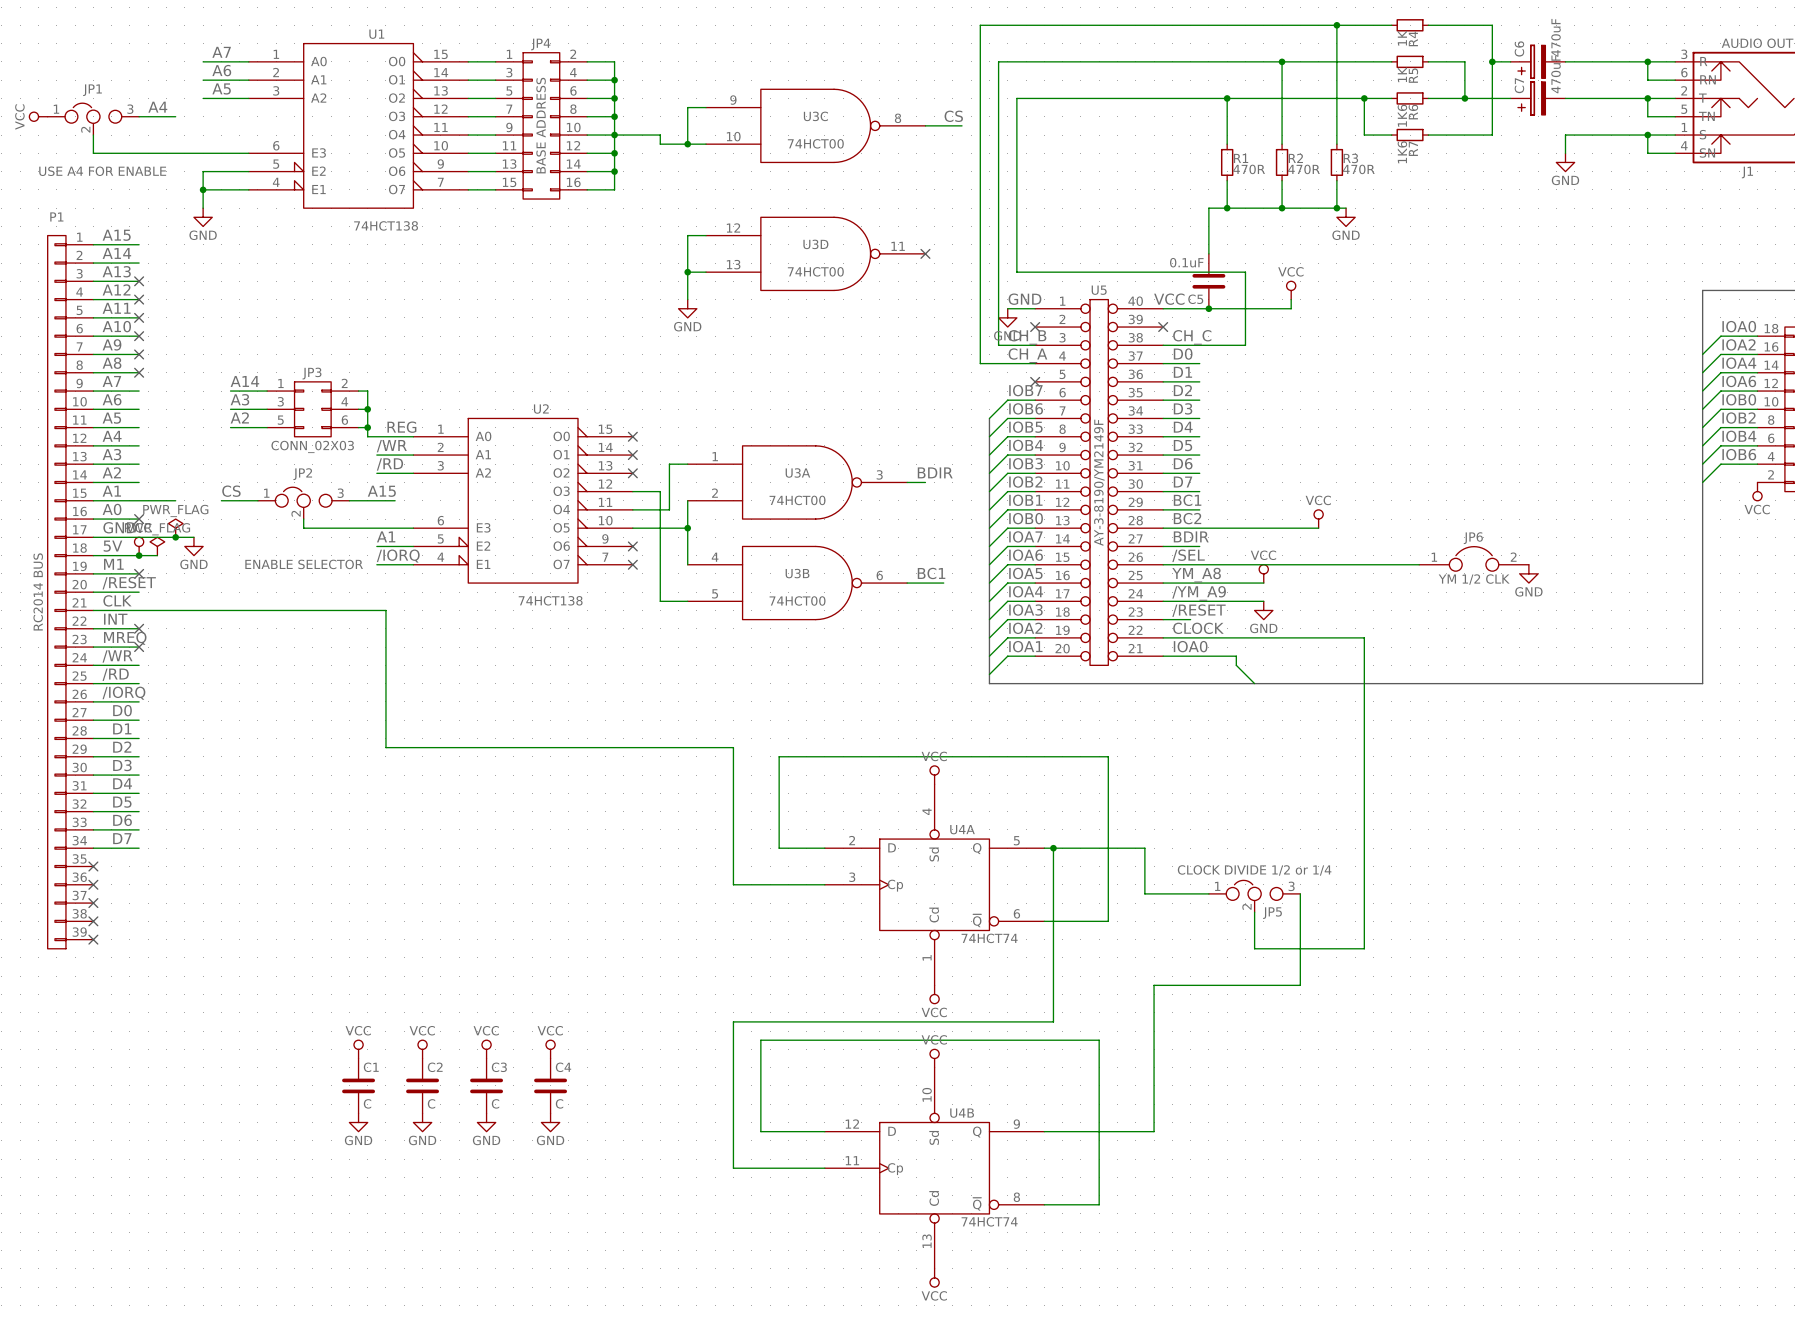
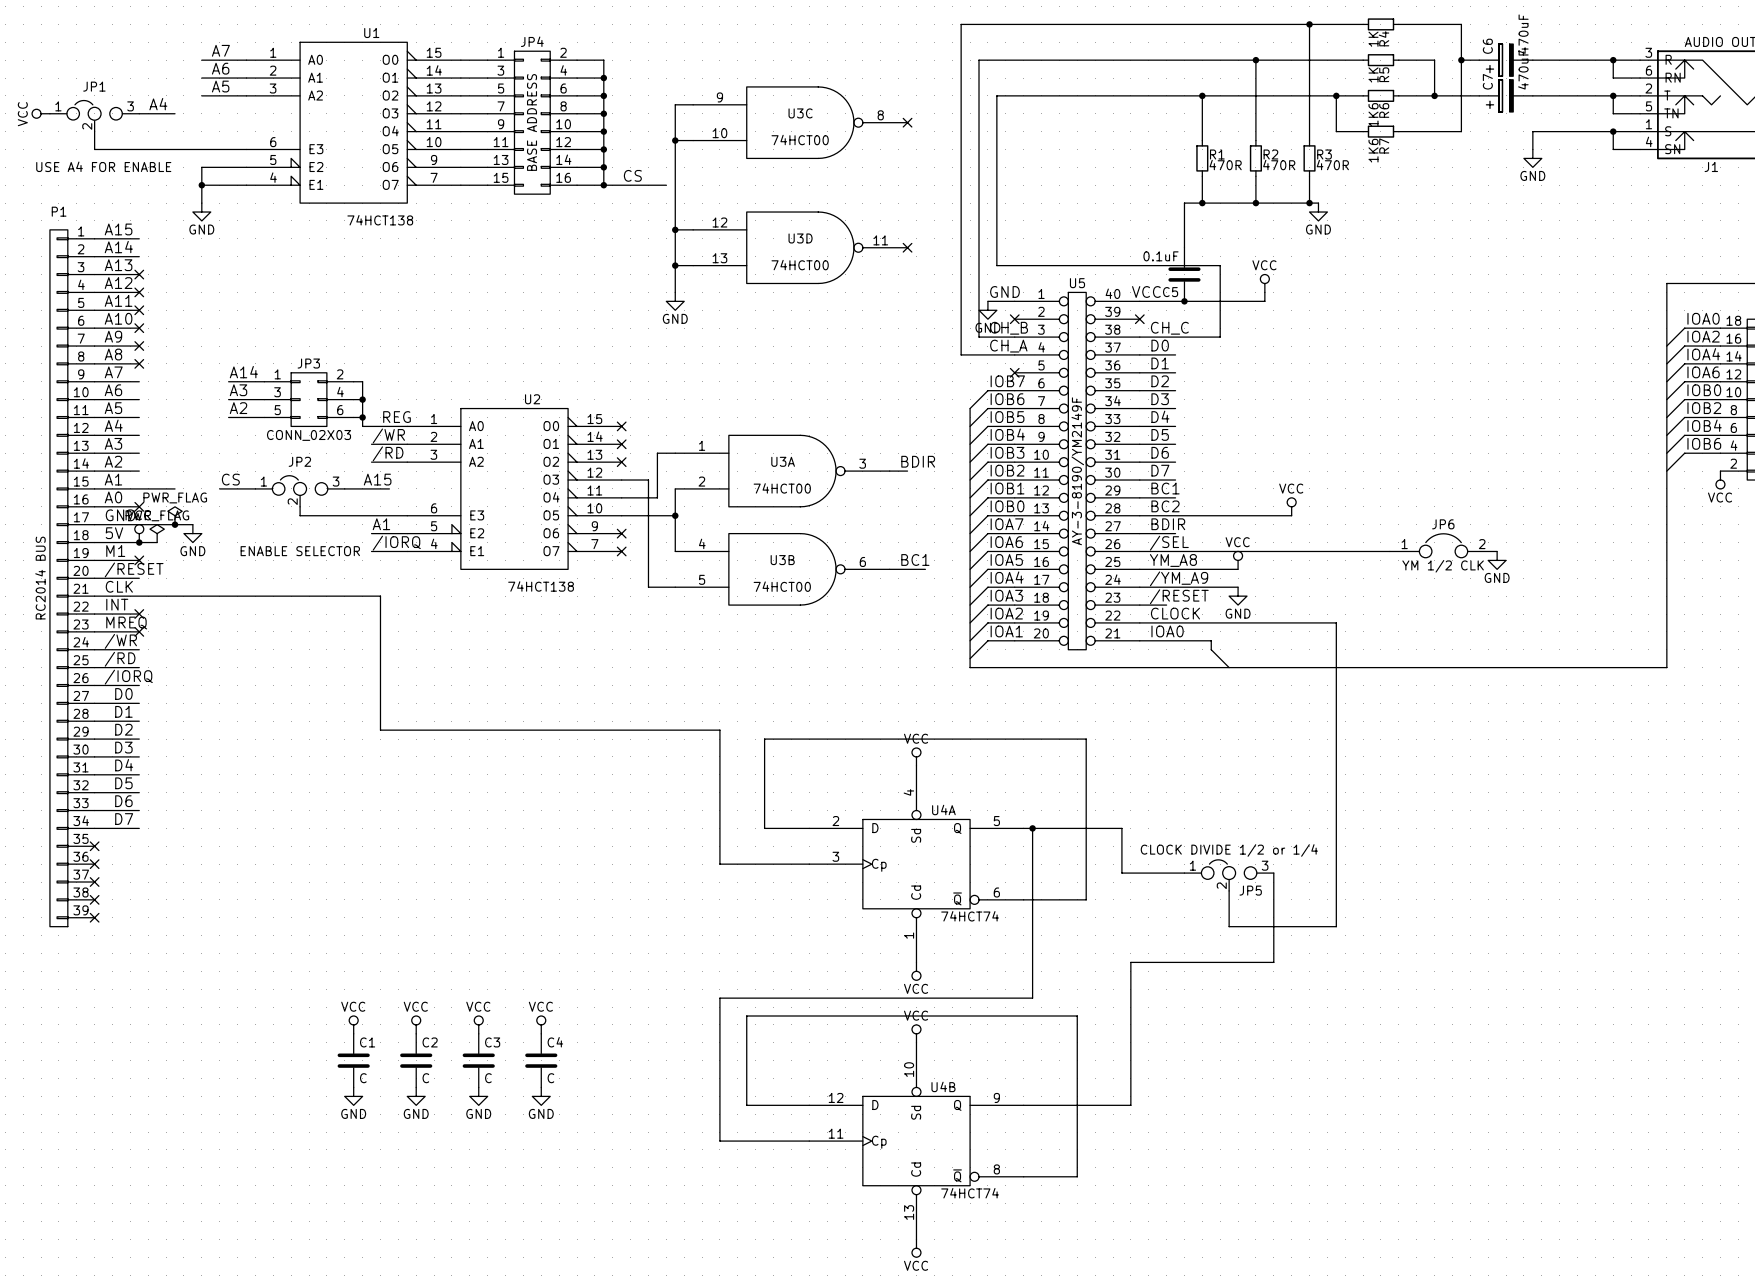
label: CS (953, 116) -> none
wire: (925, 125) (962, 125) -> none
no-connect mark: none -> (907, 122)
wire: (614, 135) (660, 135) (660, 144) (687, 144) -> (675, 229) (675, 140)
label: none -> CS (632, 175)
wire: none -> (603, 185) (666, 185)
junction: none -> (603, 185)
junction: none -> (675, 229)

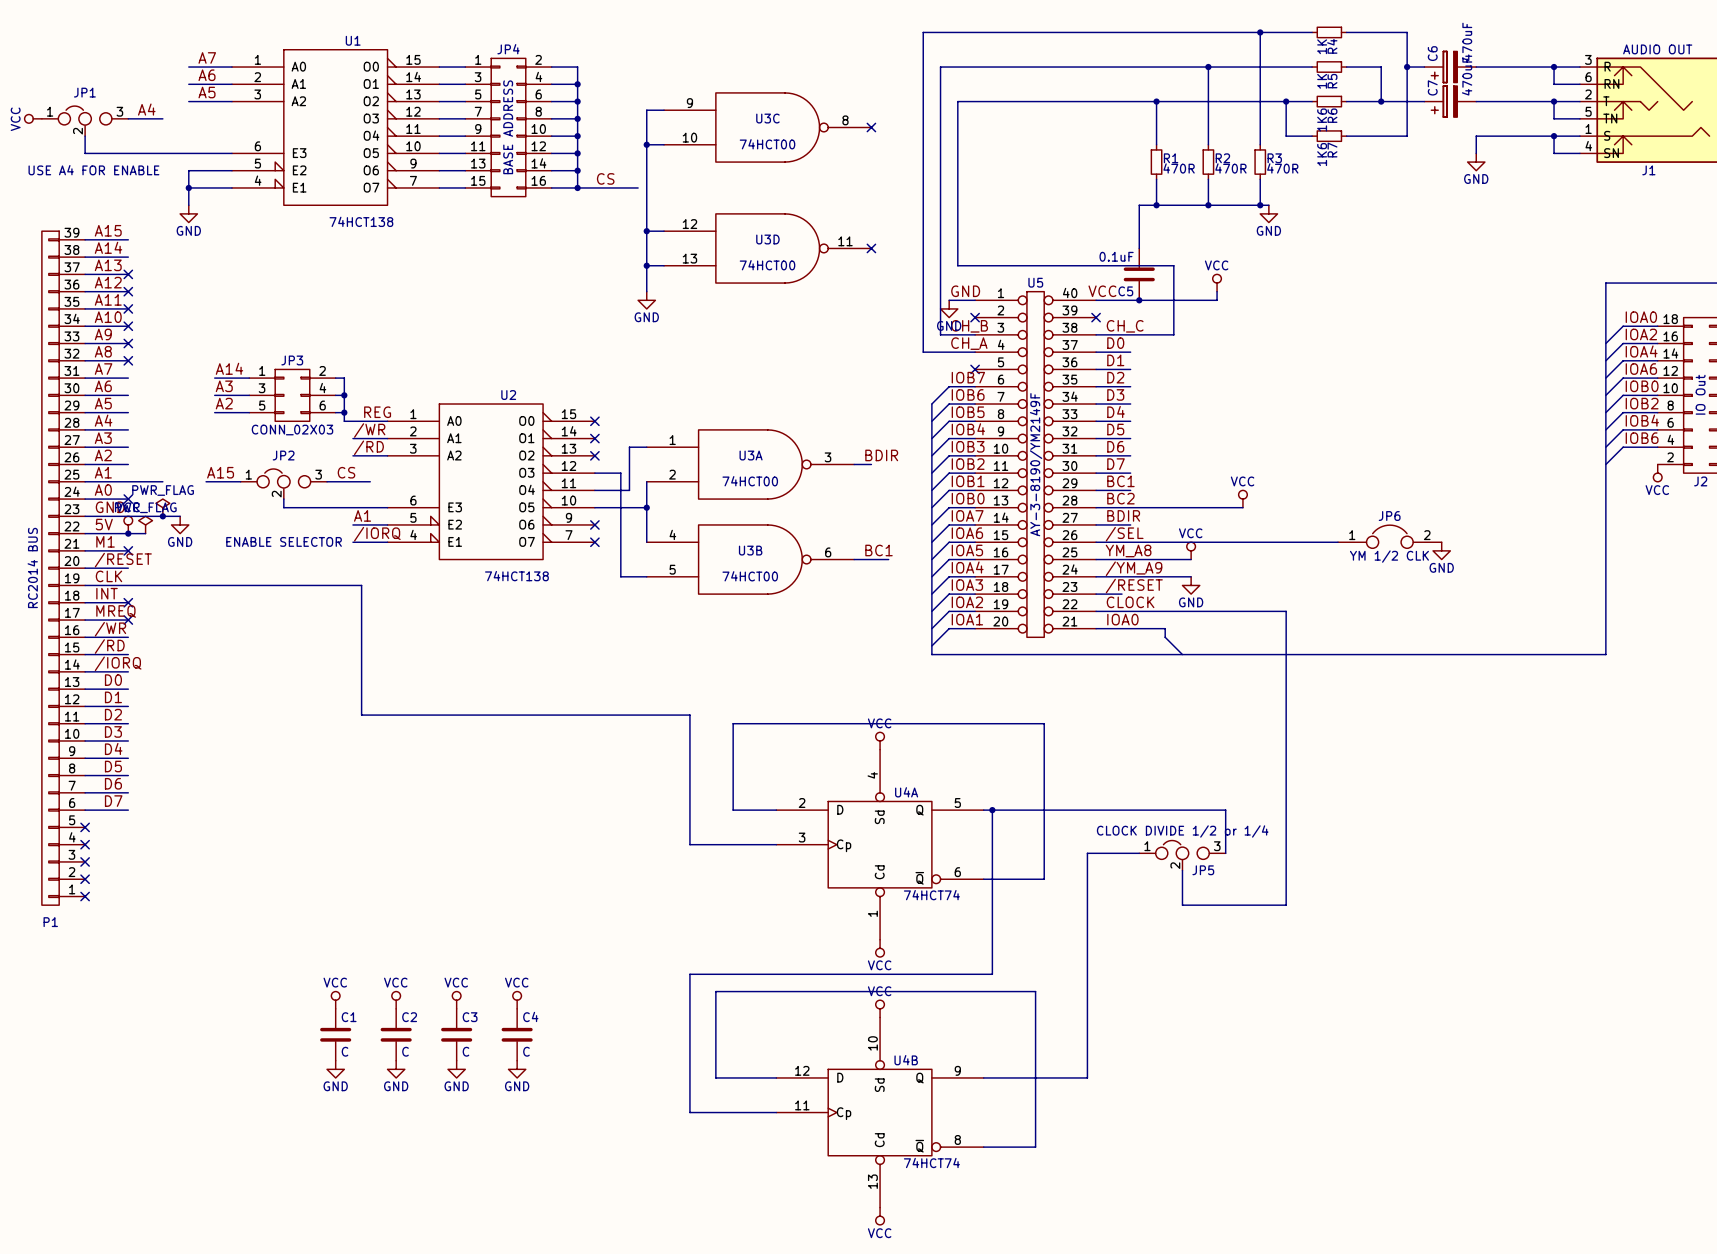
label: CS (230, 479) -> A15 (220, 472)
label: none -> CS (346, 472)
label: A15 (377, 479) -> none
P1 flip: as is (58, 578) -> up-down (50, 568)
wire: (1121, 828) (1121, 873) (1130, 873) -> (1087, 939) (1087, 853)
wire: (1273, 873) (1273, 962) (1130, 962) -> (1225, 853) (1225, 810) (1078, 810)

